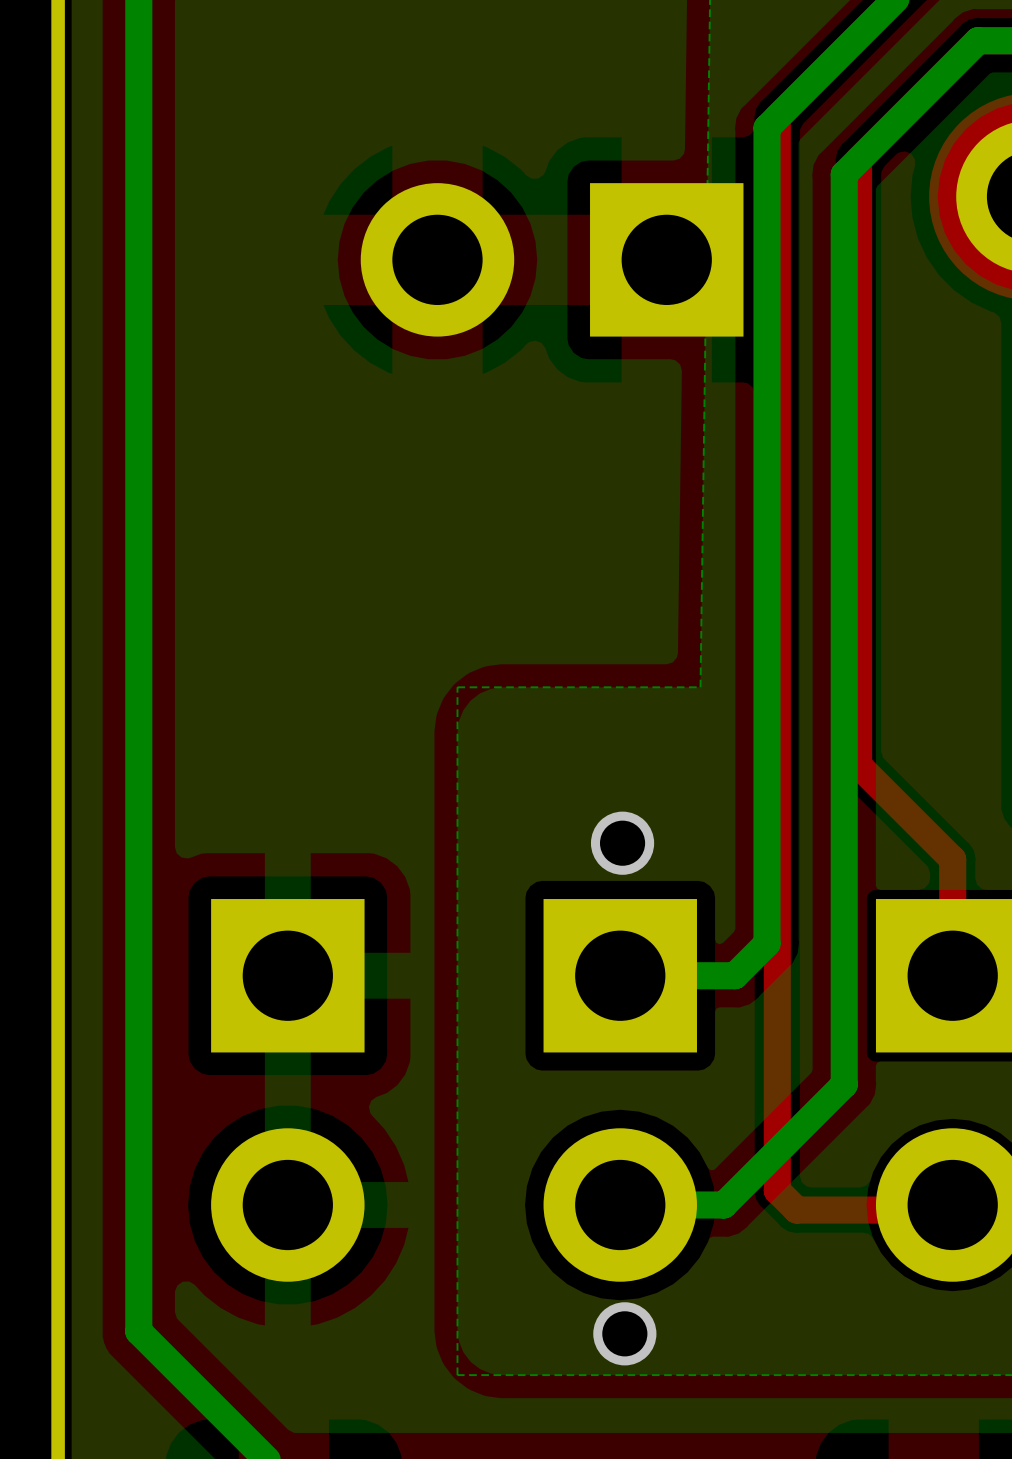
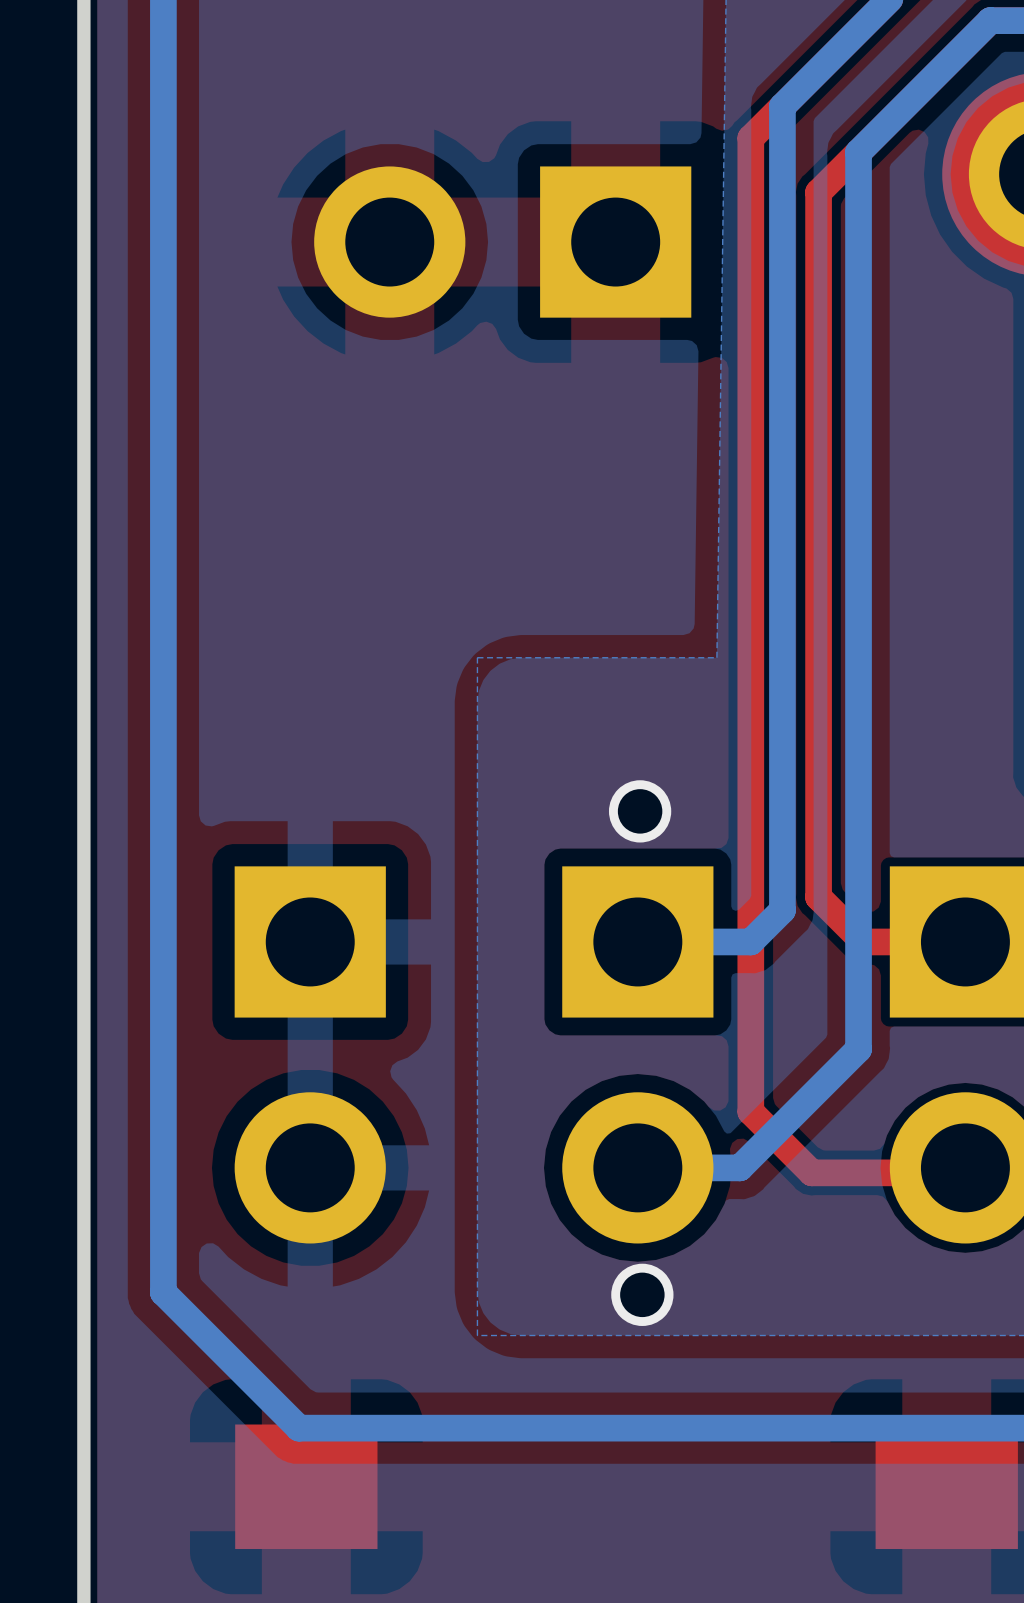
top track: (777, 117) (777, 1190) -> (792, 96) (750, 138) (750, 1111) (792, 1153)
top track: (858, 160) (858, 765) (952, 859) (952, 975) -> (872, 138) (818, 192) (818, 897) (863, 941) (965, 941)
part position: (552, 259) -> (502, 242)

